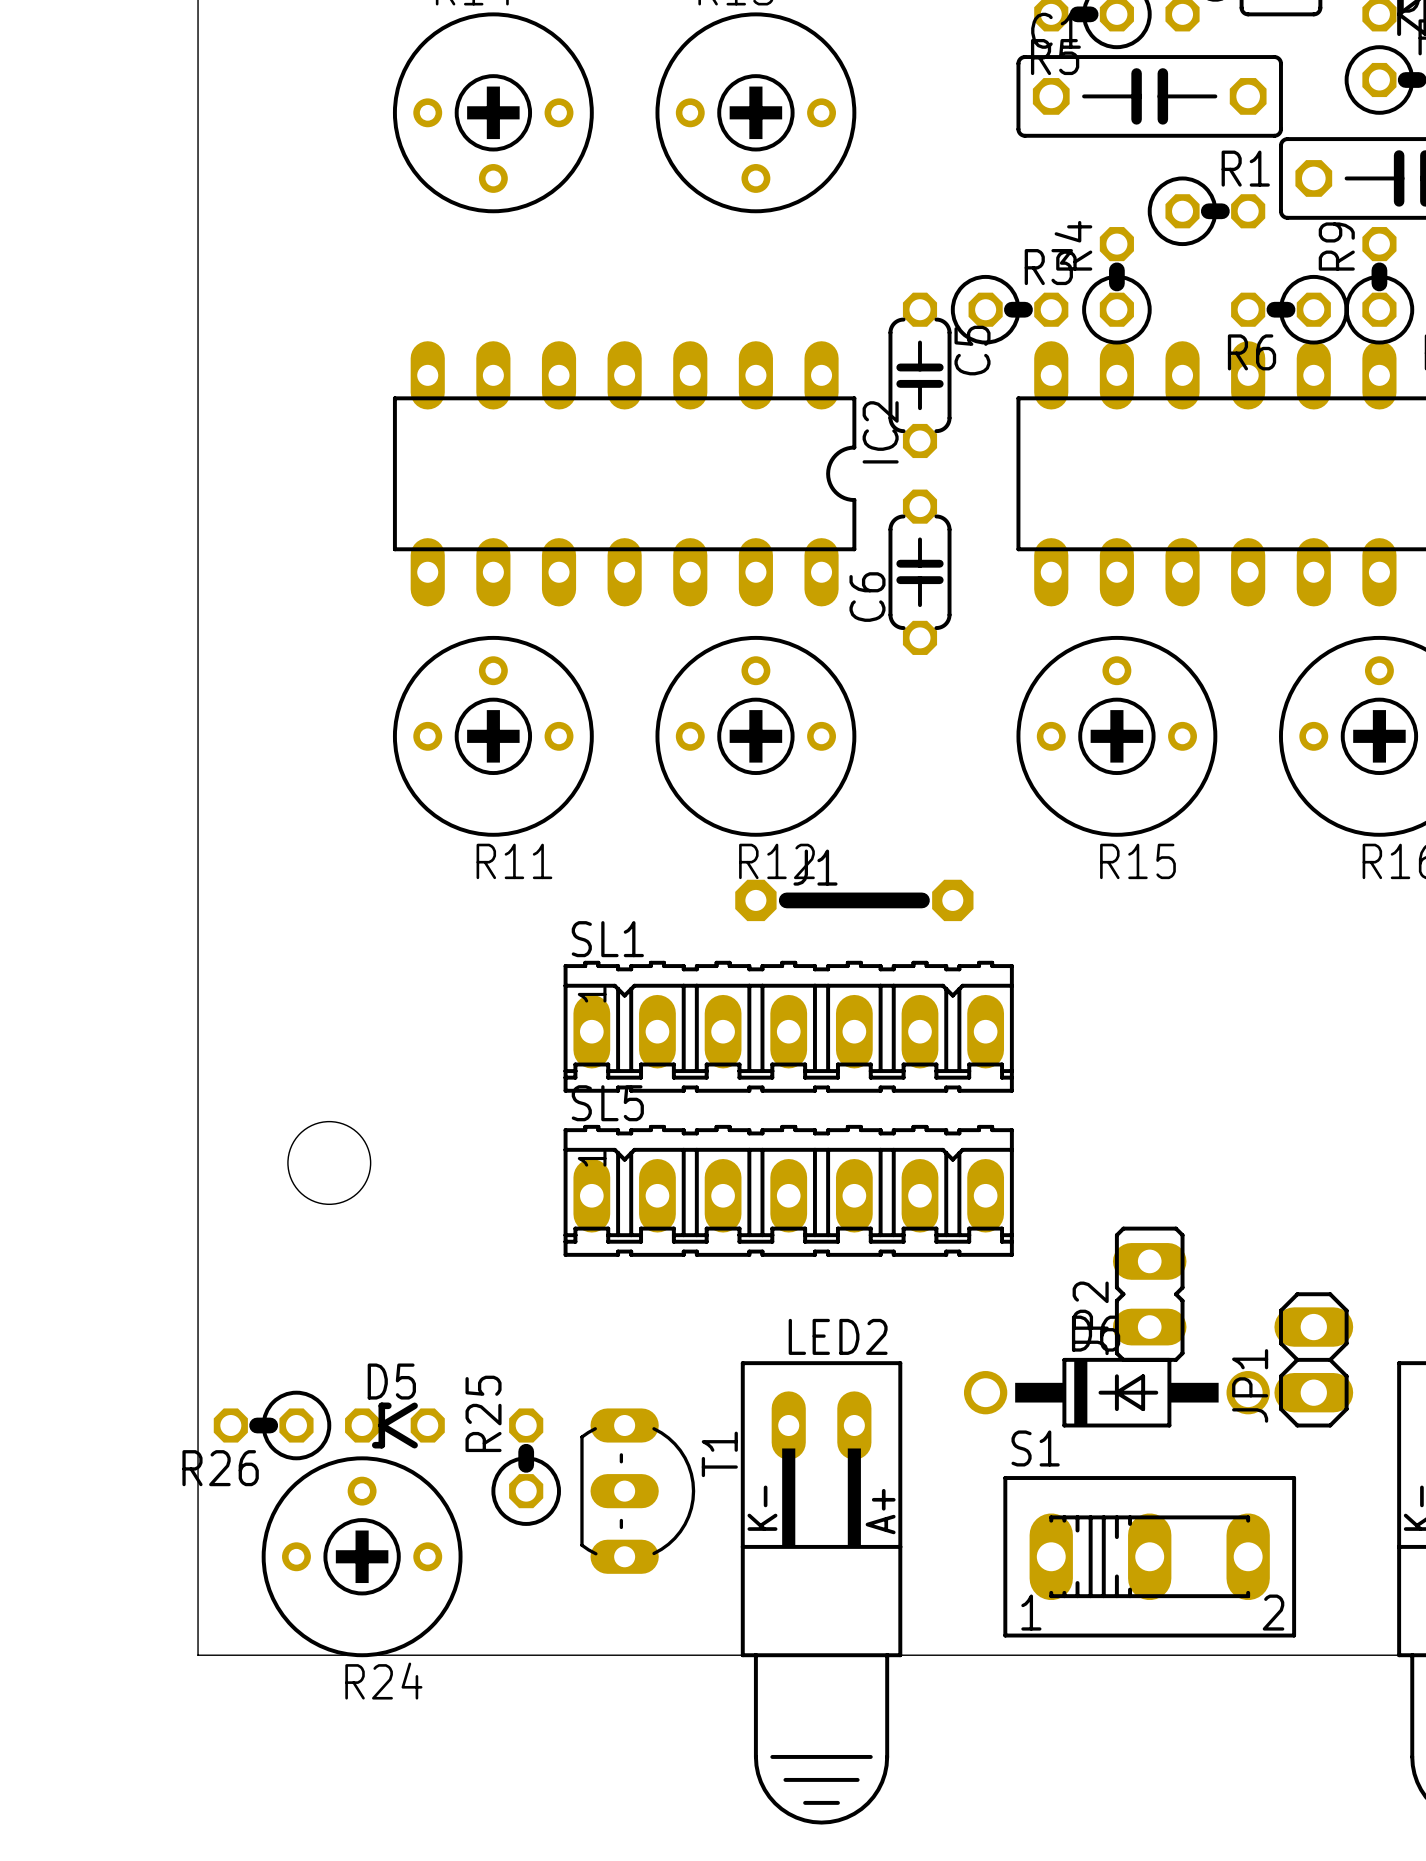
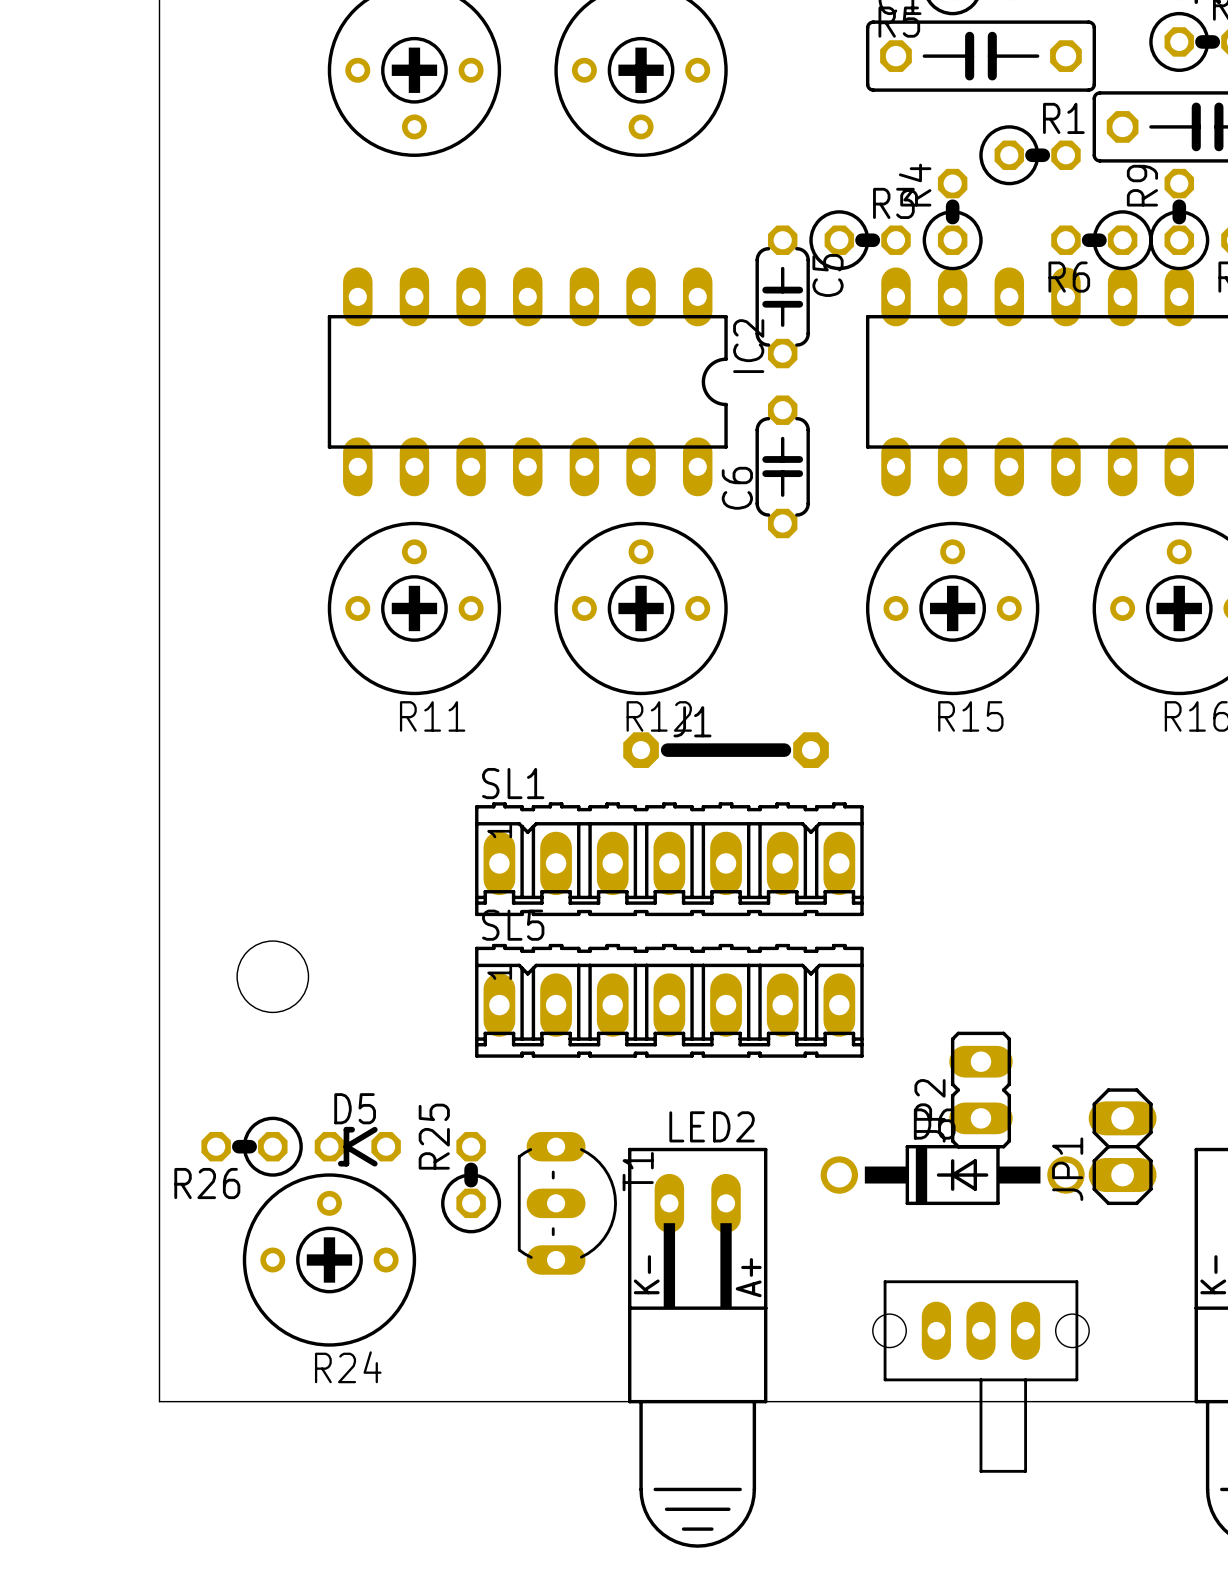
R26 position: (272, 1425) -> (252, 1146)
D5 position: (394, 1425) -> (357, 1146)
R25 position: (526, 1467) -> (471, 1182)
T1 position: (637, 1491) -> (567, 1203)
R24 position: (362, 1556) -> (329, 1260)
S1: (1149, 1556) -> none
part: none -> (980, 1376)

